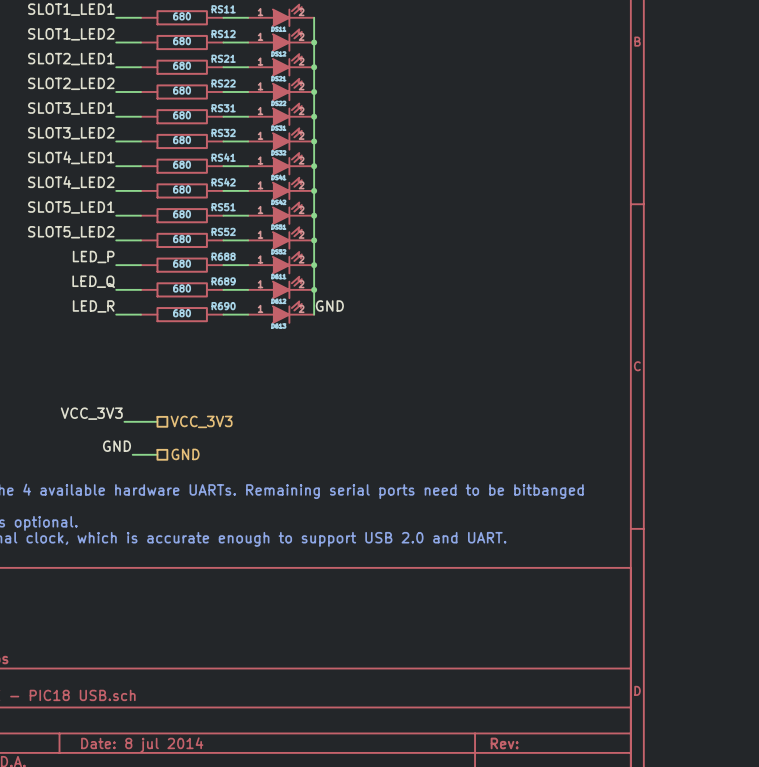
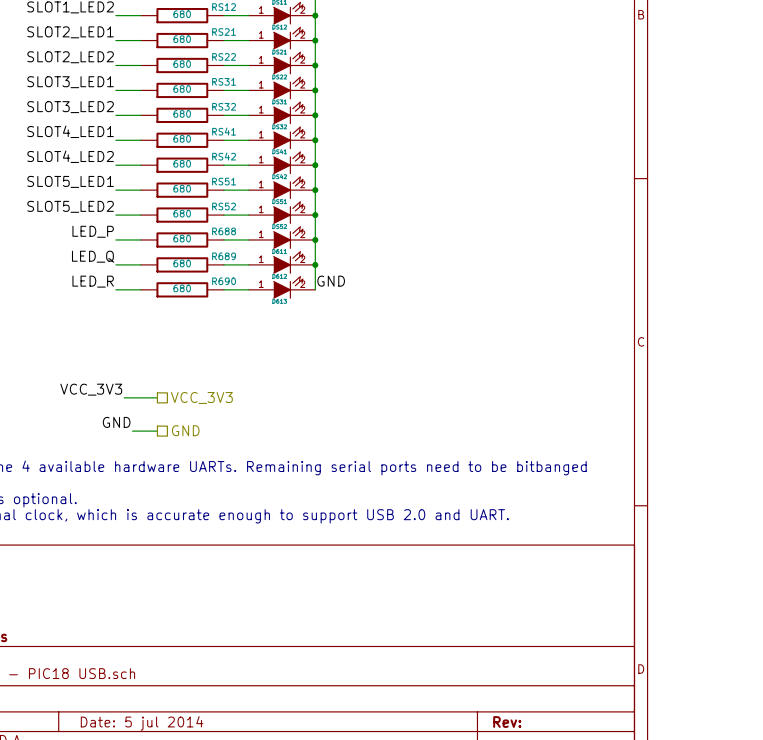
title block: Date: 8 jul 2014 (142, 744) -> Date: 5 jul 2014 (142, 723)

